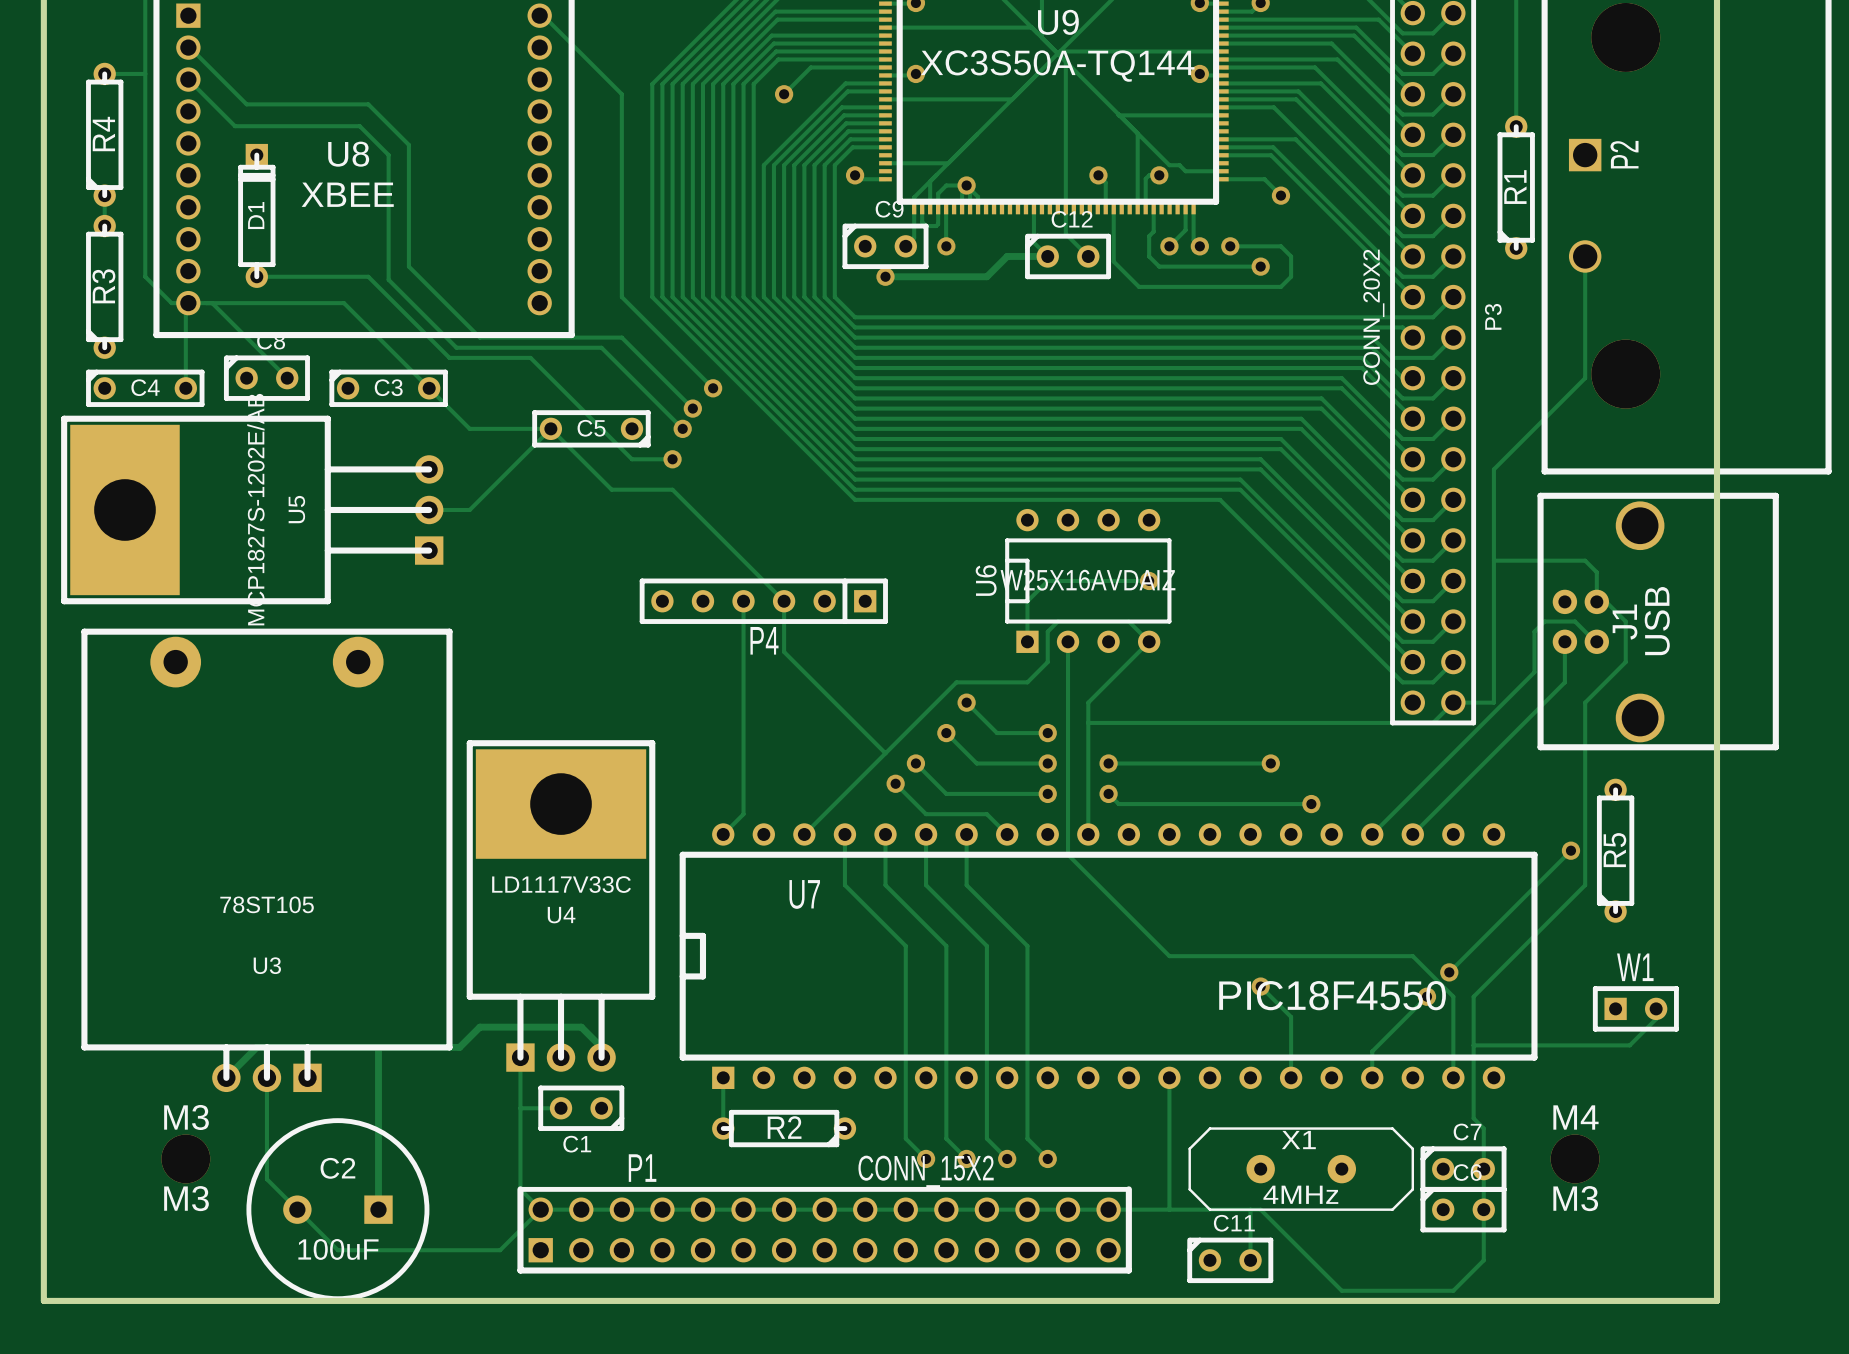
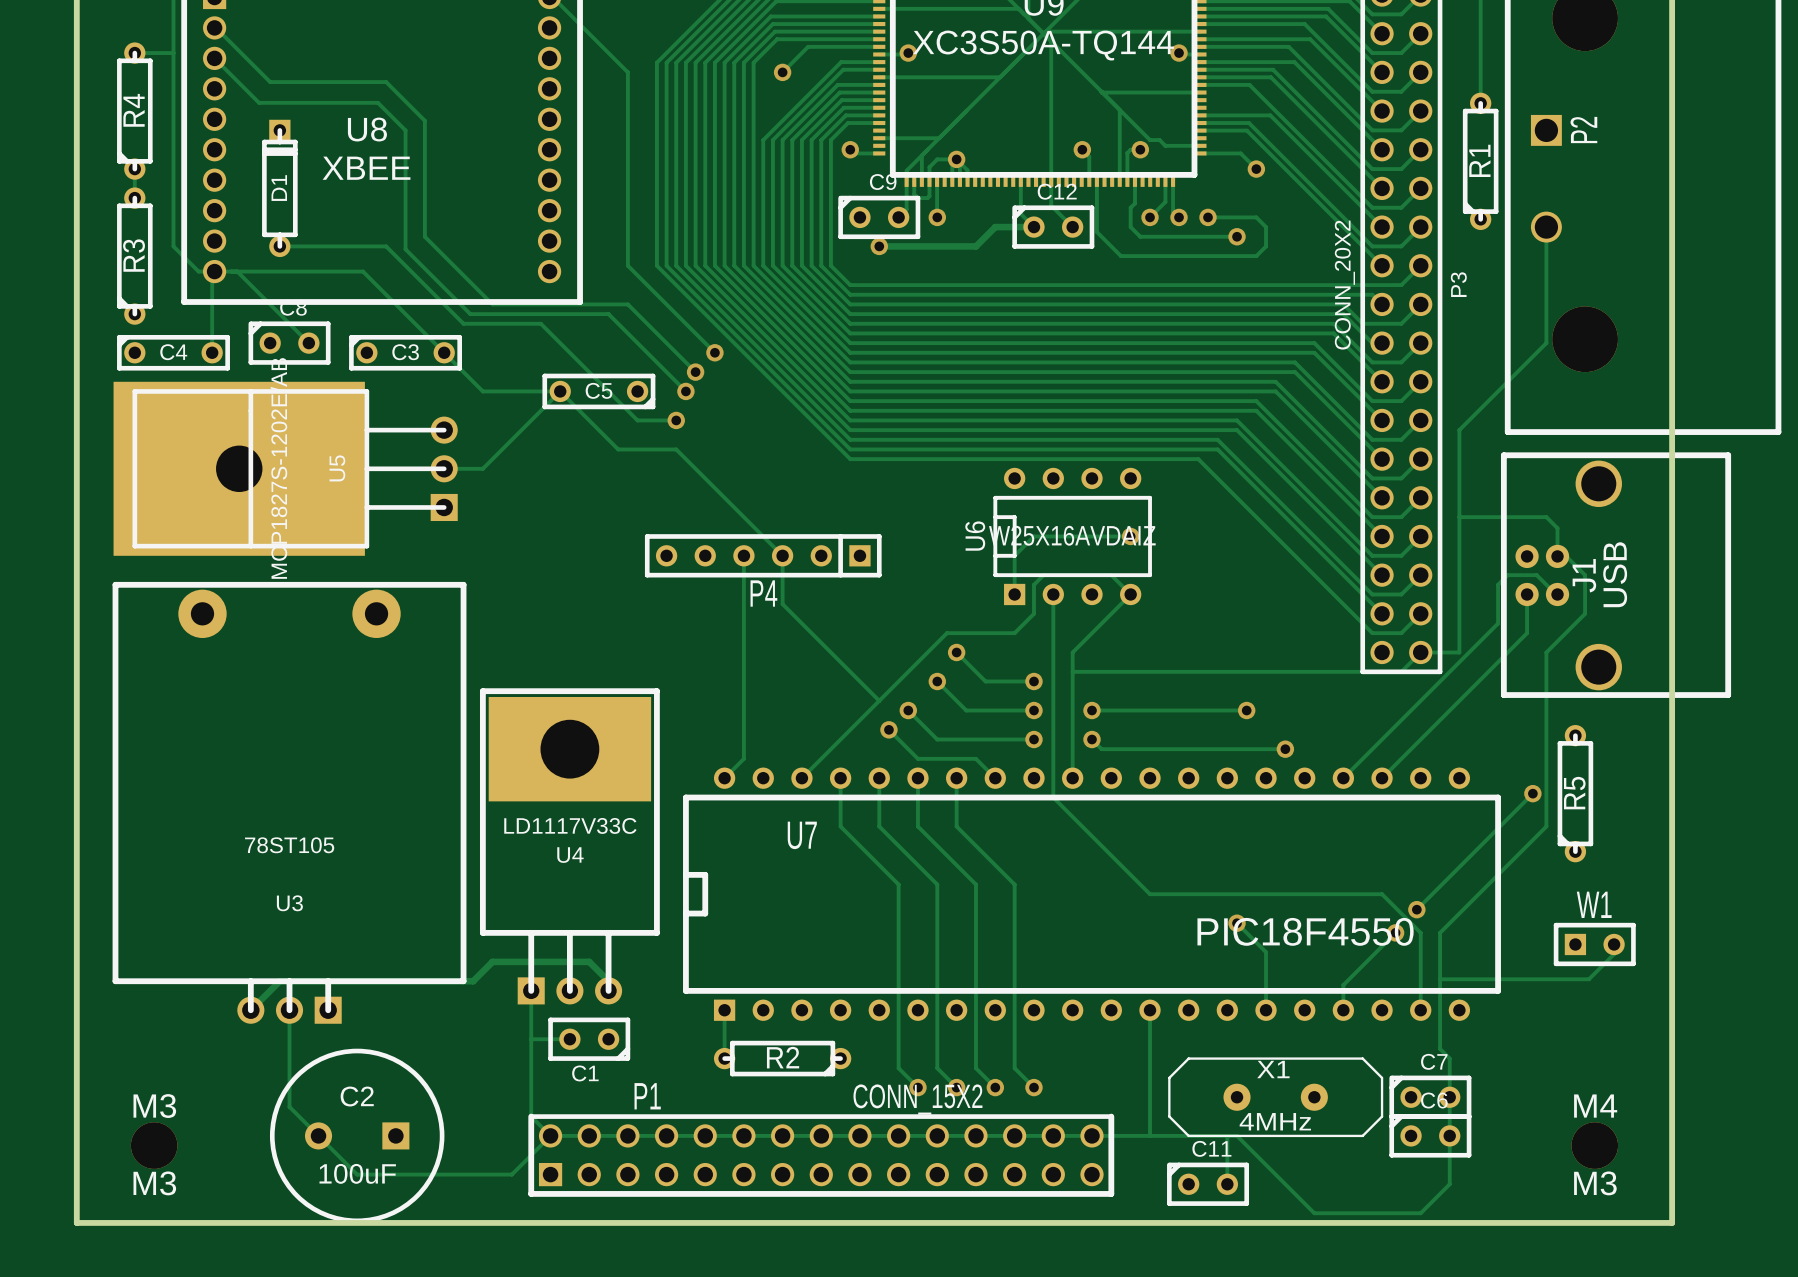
U5 footprint: [61, 415, 444, 605] -> [113, 381, 458, 556]
track: (378, 1047) (378, 1209) -> none
M3 position: (185, 1158) -> (154, 1145)
M4 position: (1575, 1158) -> (1594, 1145)

